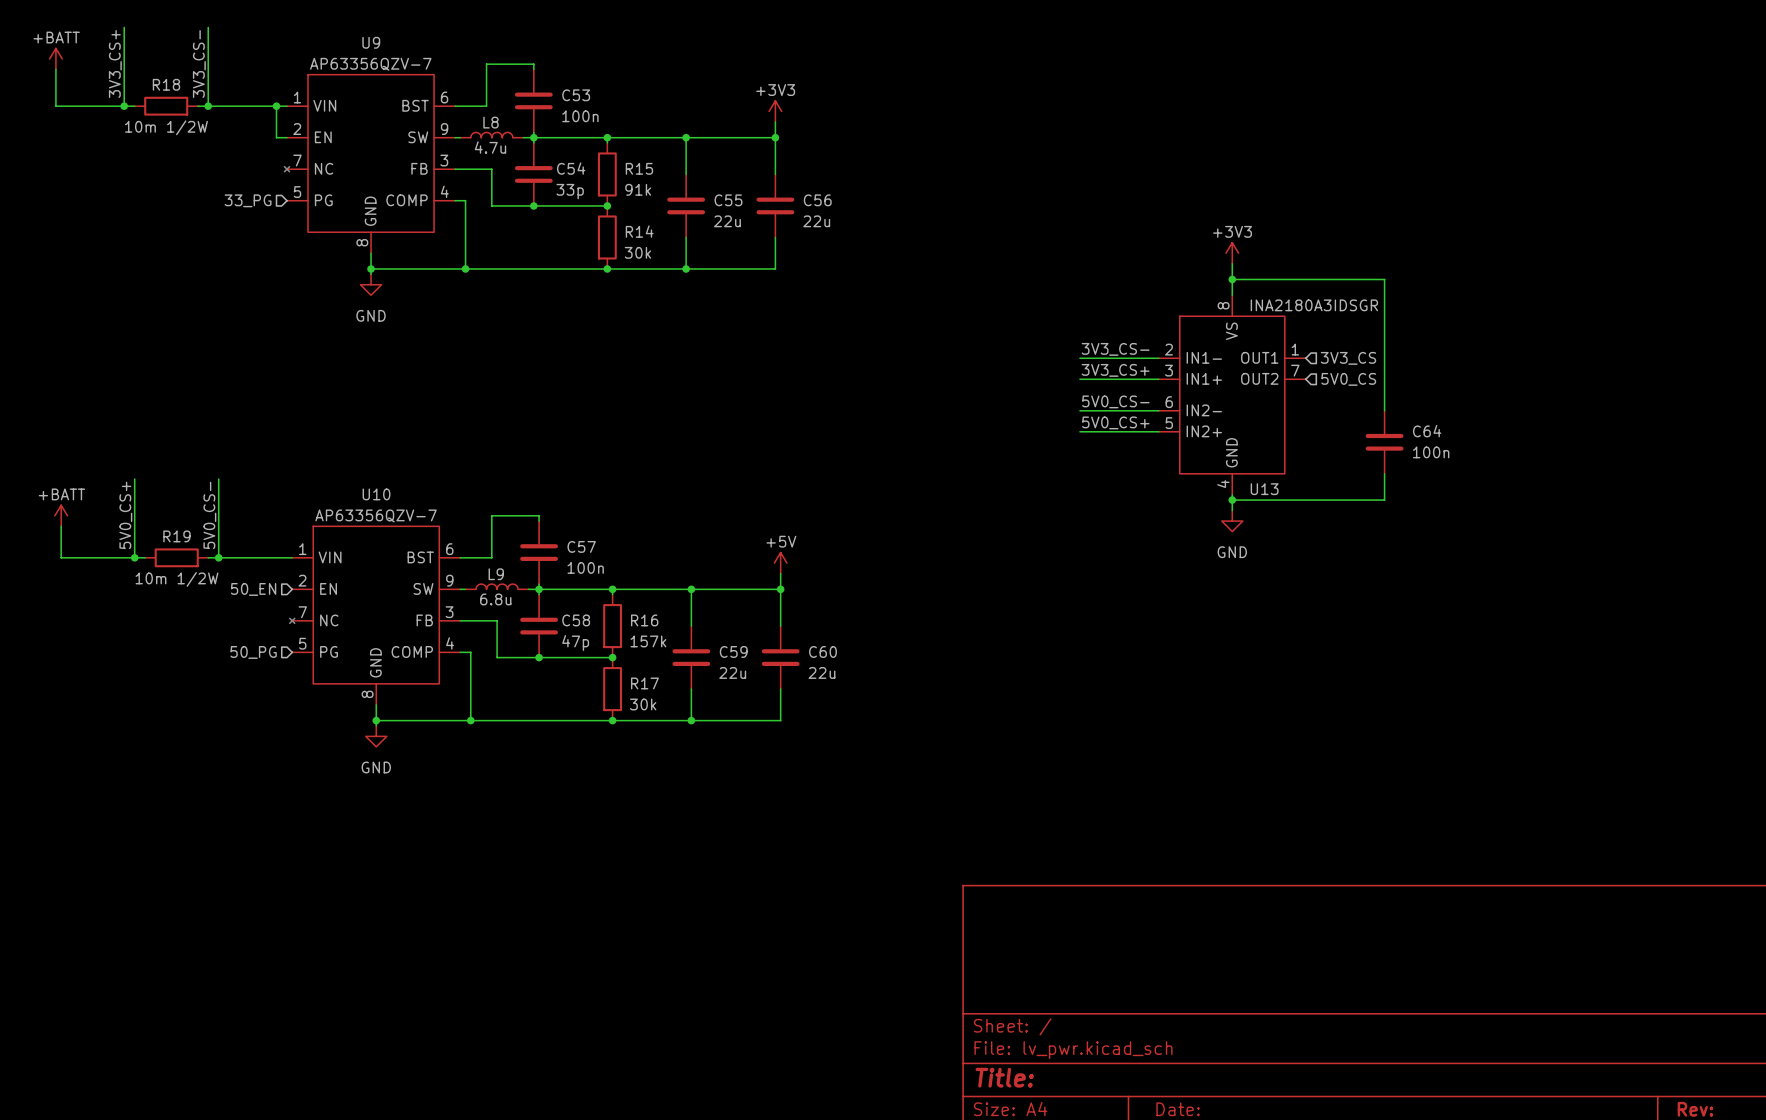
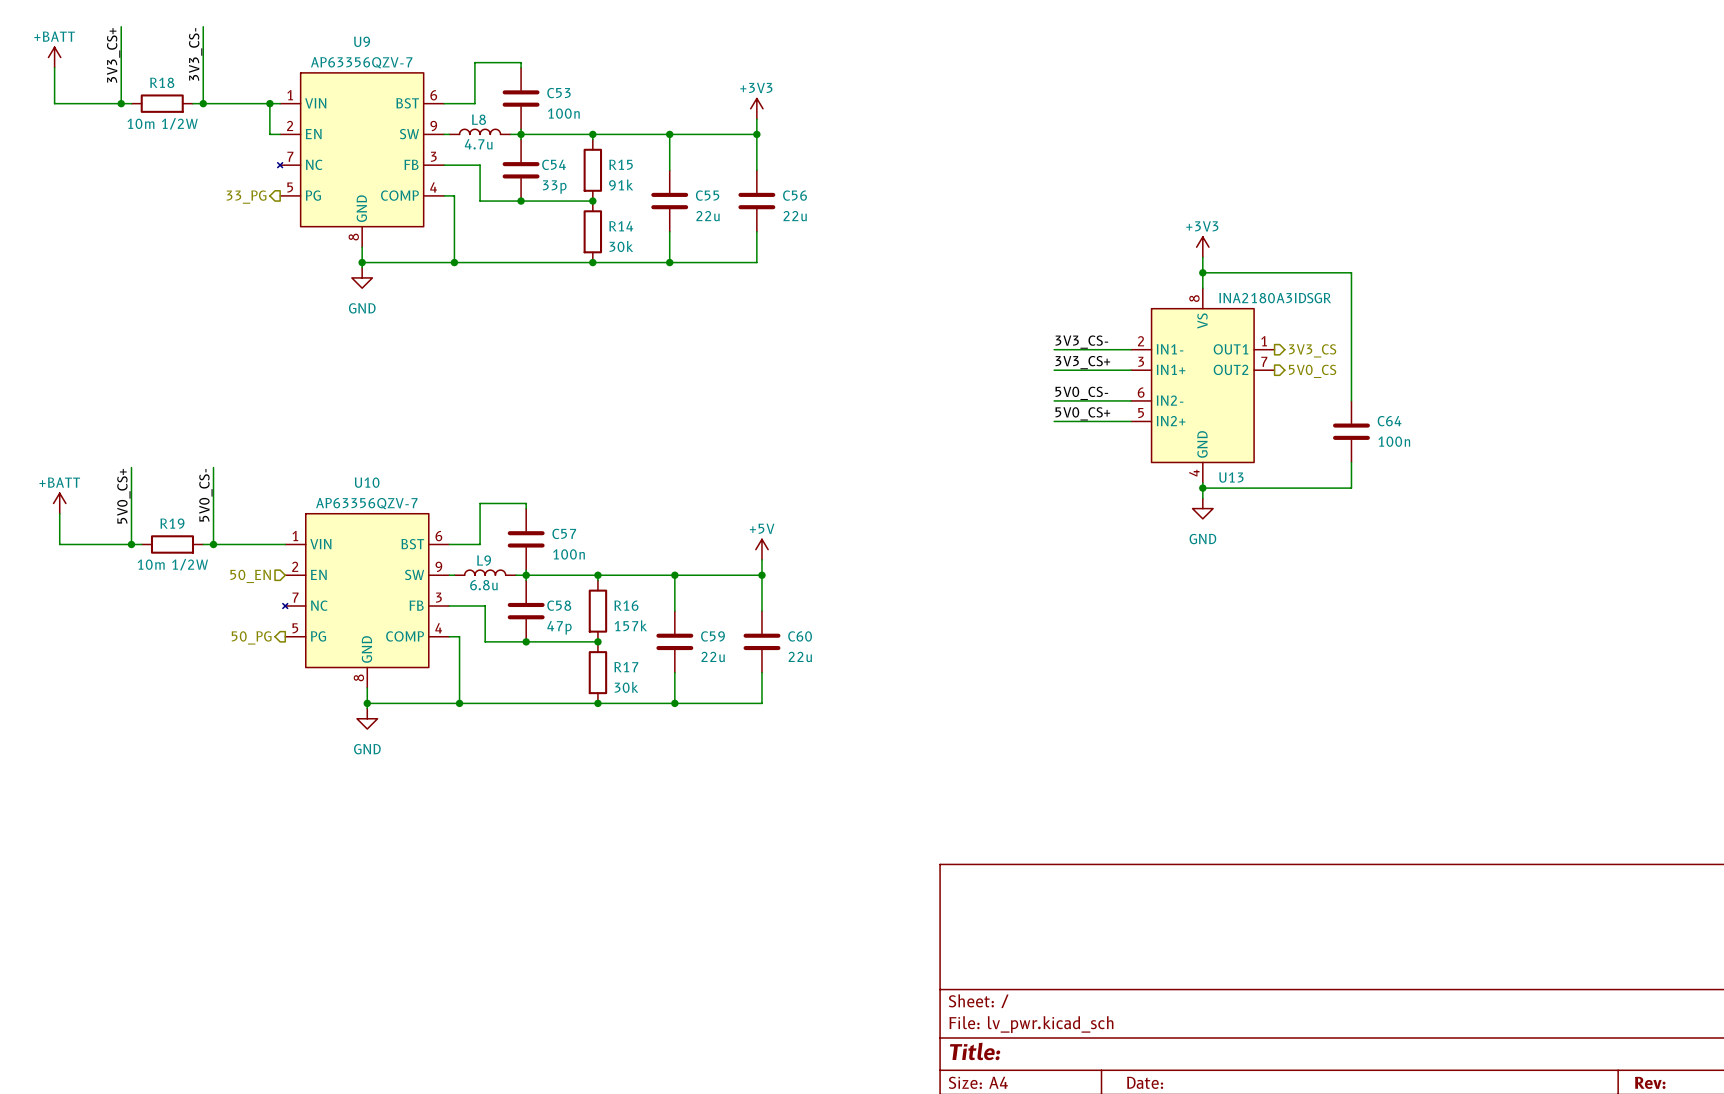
hierarchical label shape: input (248, 200) -> output (246, 197)
hierarchical label shape: input (1348, 358) -> output (1312, 350)
hierarchical label shape: input (1348, 379) -> output (1312, 371)
hierarchical label shape: input (253, 652) -> output (251, 637)

